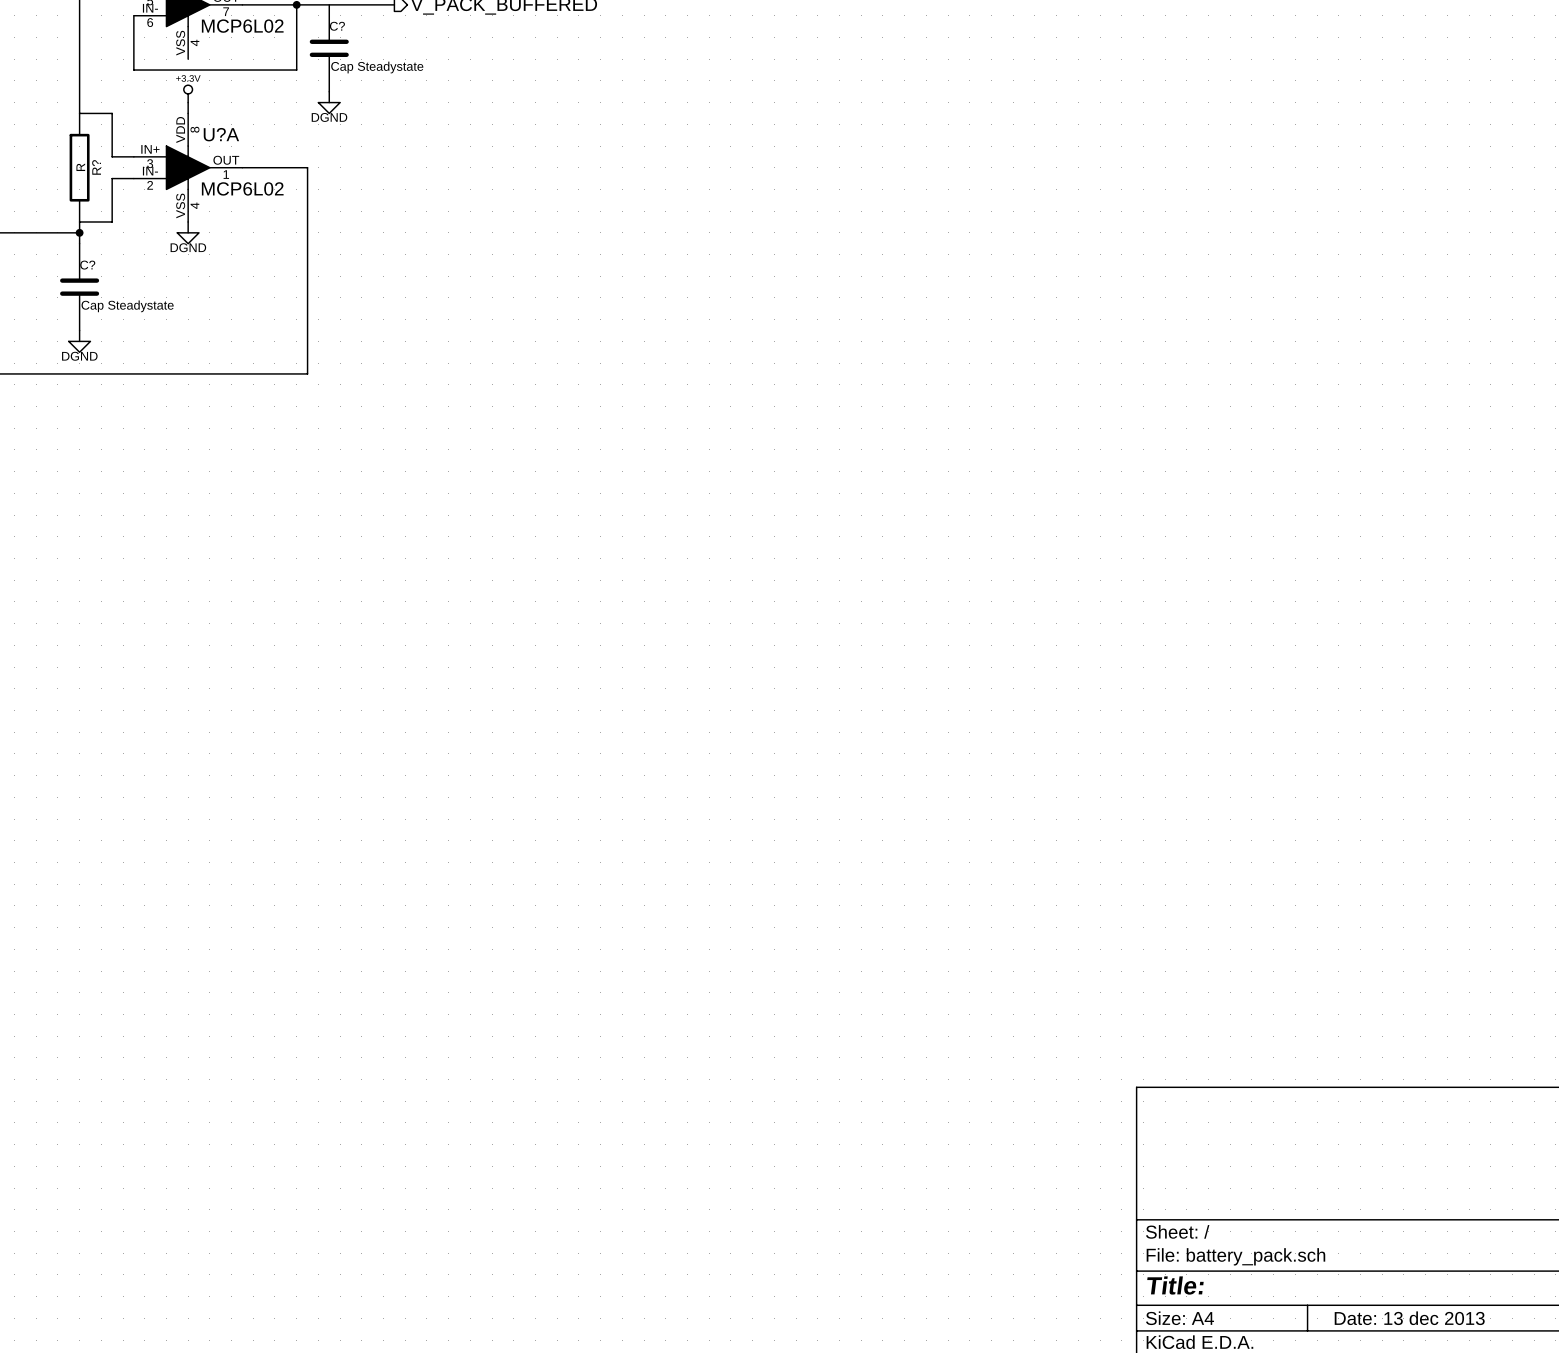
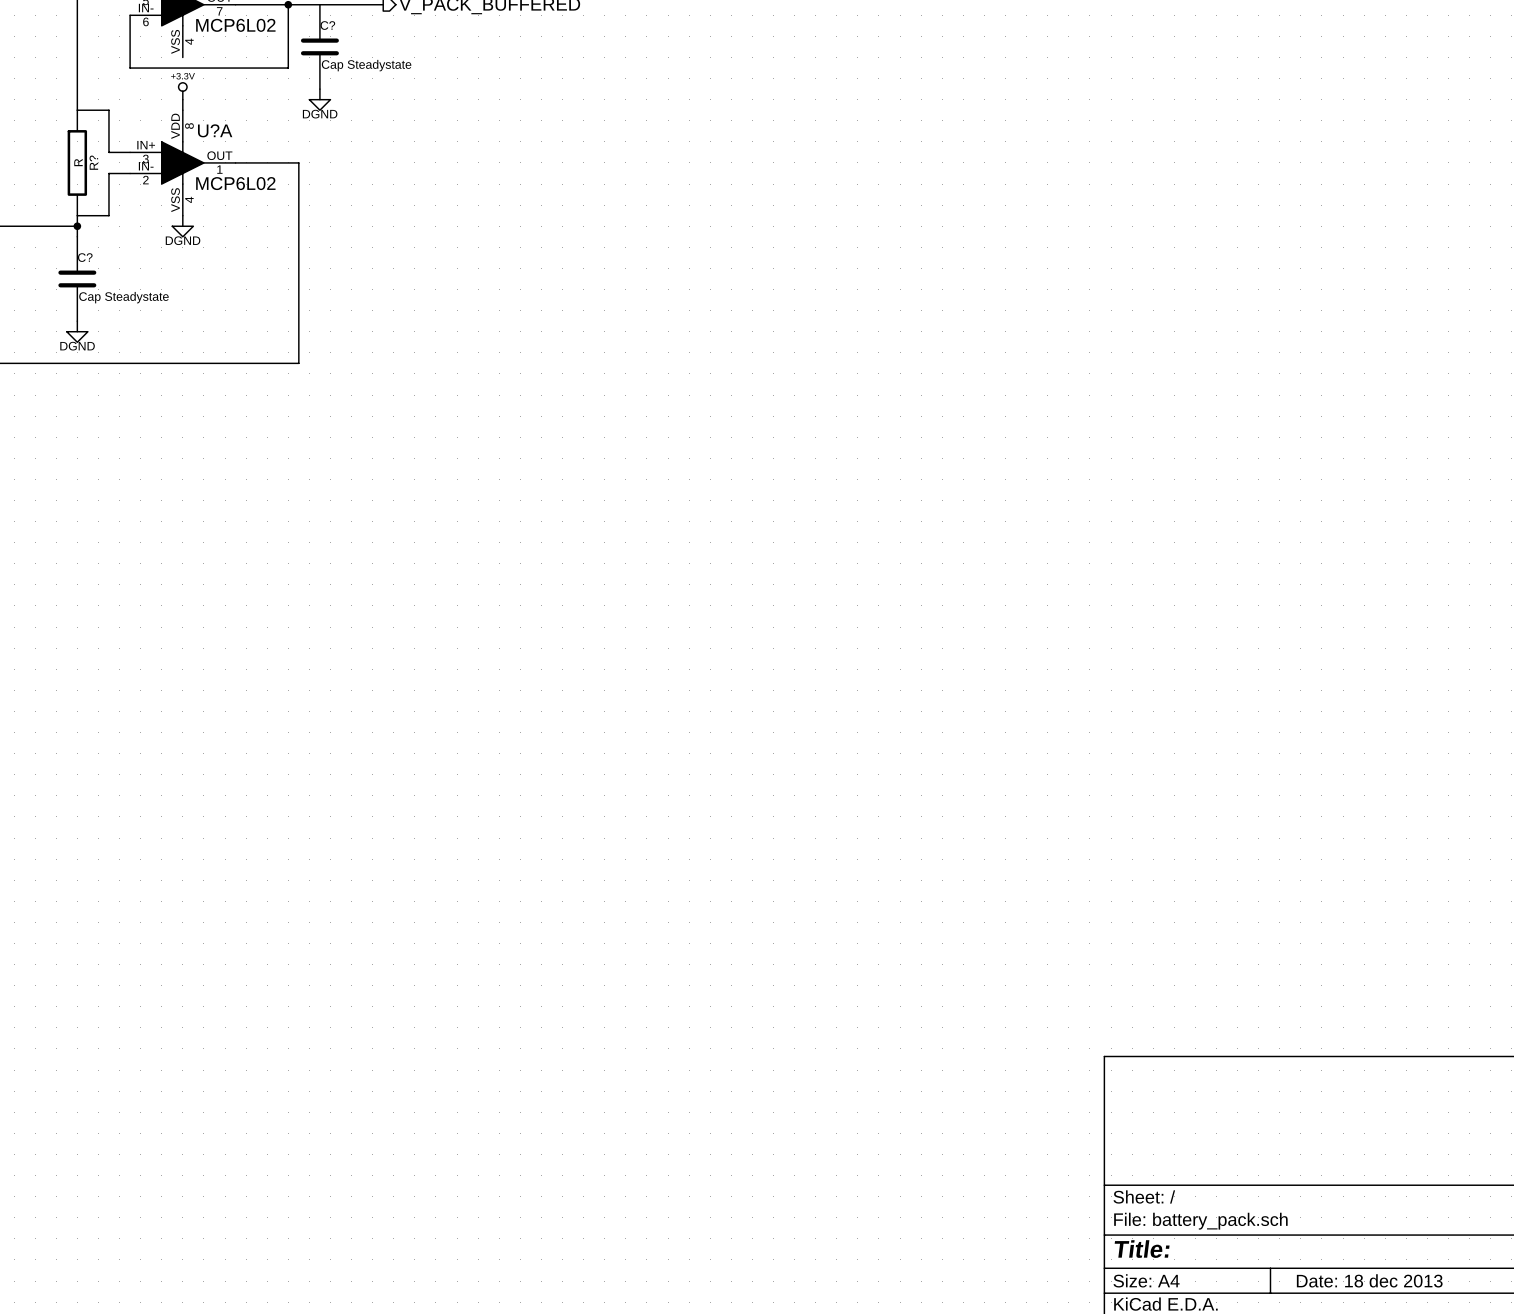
title block: Date: 13 dec 2013 (1409, 1318) -> Date: 18 dec 2013 (1369, 1280)

